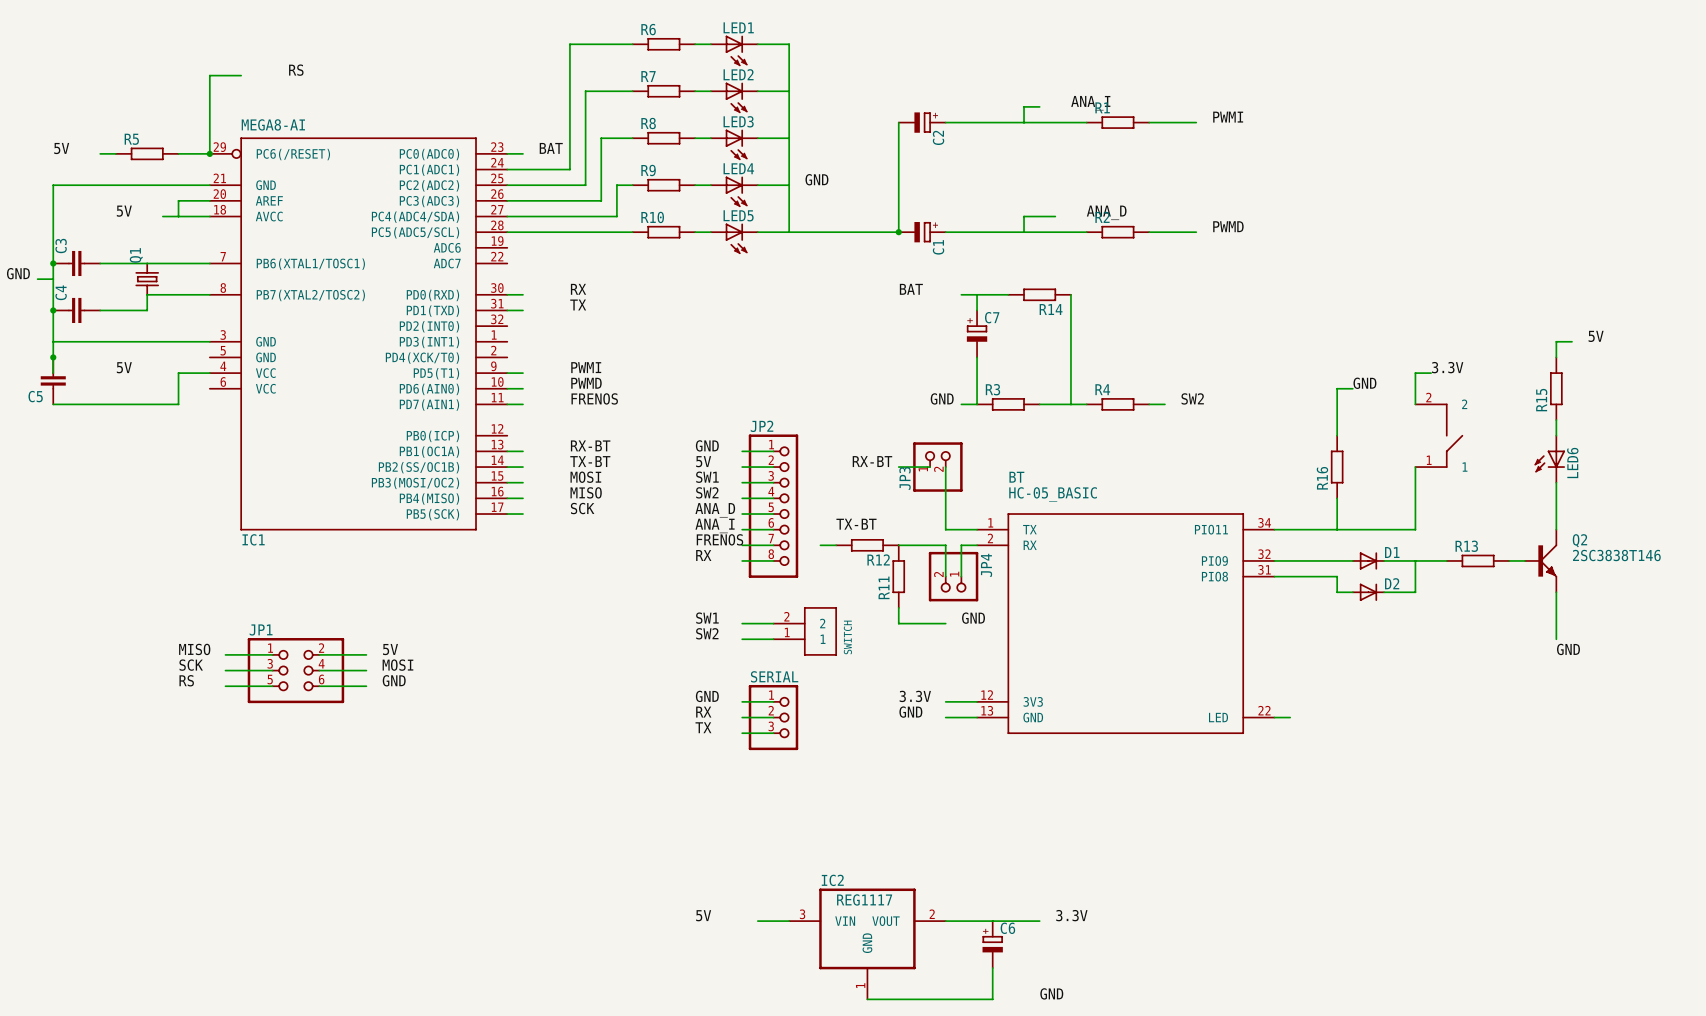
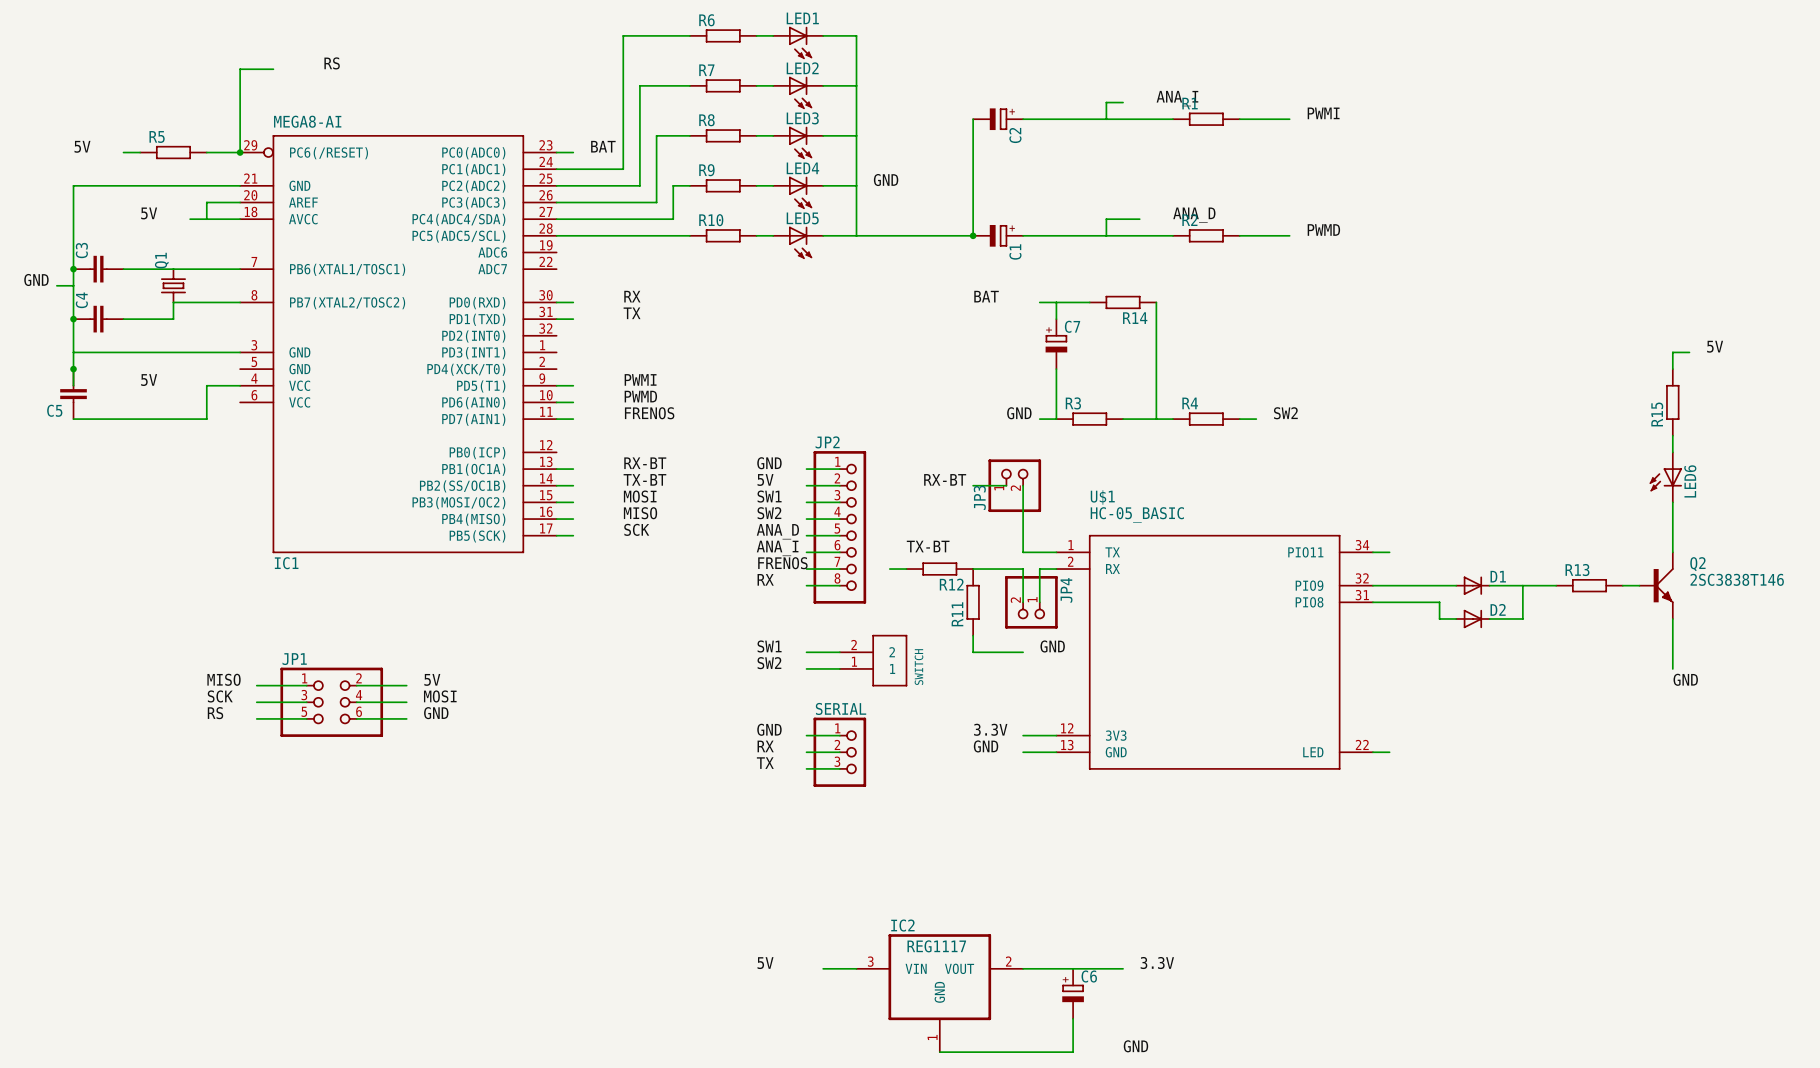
label: 3.3V (1447, 367) -> none
wire: (1431, 373) (1415, 373) (1415, 404) -> none
label: GND (1364, 383) -> none
wire: (1352, 388) (1337, 388) (1337, 435) -> none
part: (1439, 435) -> none
R16: (1337, 467) -> none
wire: (1415, 467) (1415, 529) (1290, 529) -> none
BT name: BT (1016, 477) -> U$1 (1102, 497)
wire: (1337, 498) (1337, 529) -> none

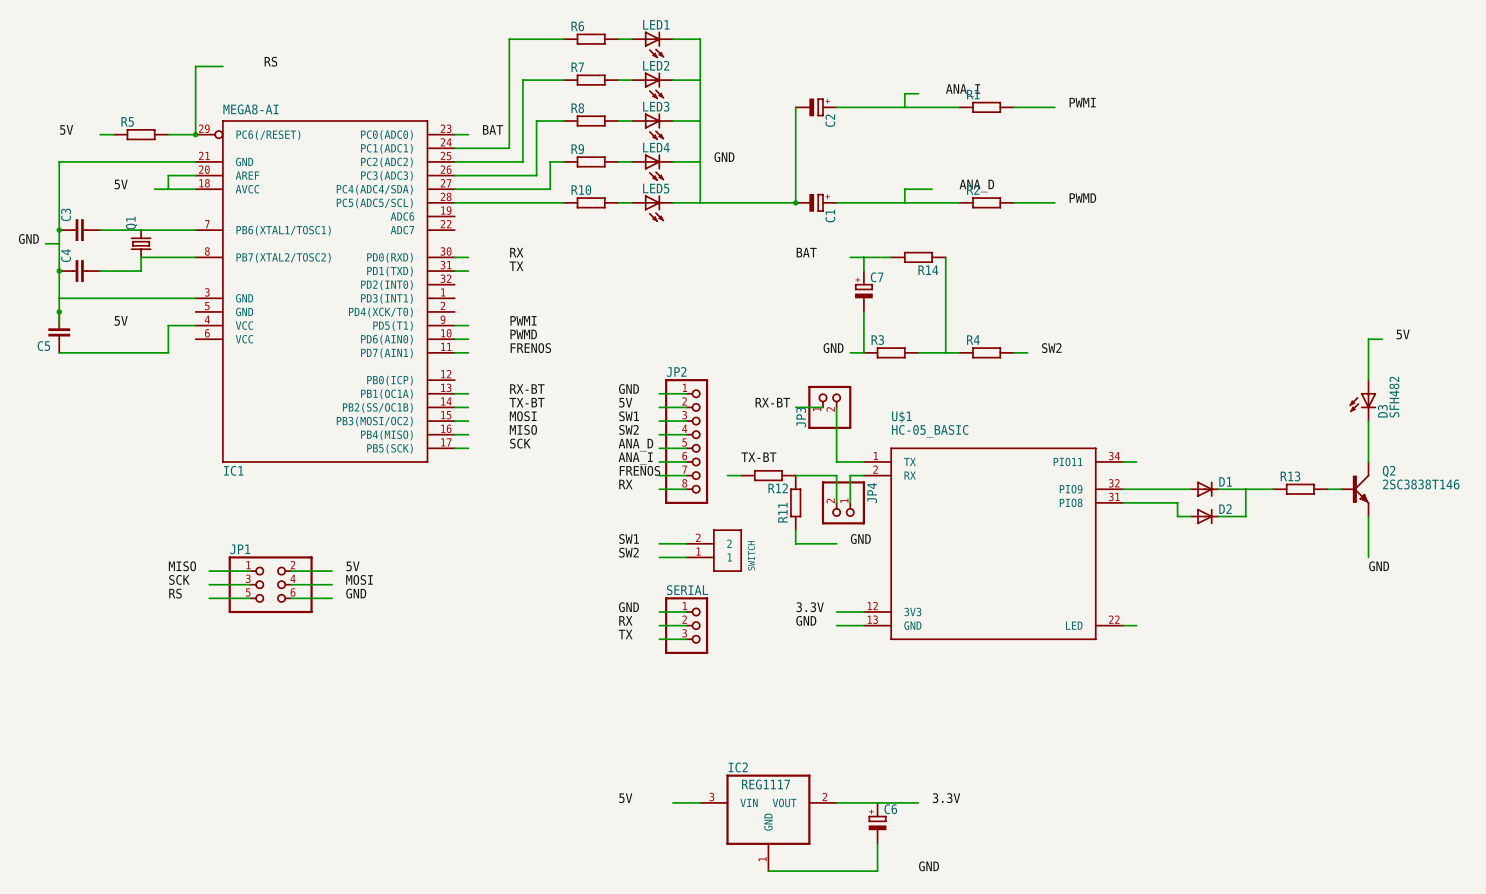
label position: 5V (1715, 346) -> 5V (1403, 334)
wire: (1689, 352) (1672, 352) (1672, 369) -> none
R15: (1672, 402) -> none
wire: none -> (1382, 339) (1368, 339) (1368, 366)
LED6 value: none -> SFH482 (1394, 397)
LED6 name: LED6 (1690, 481) -> D3 (1382, 411)

